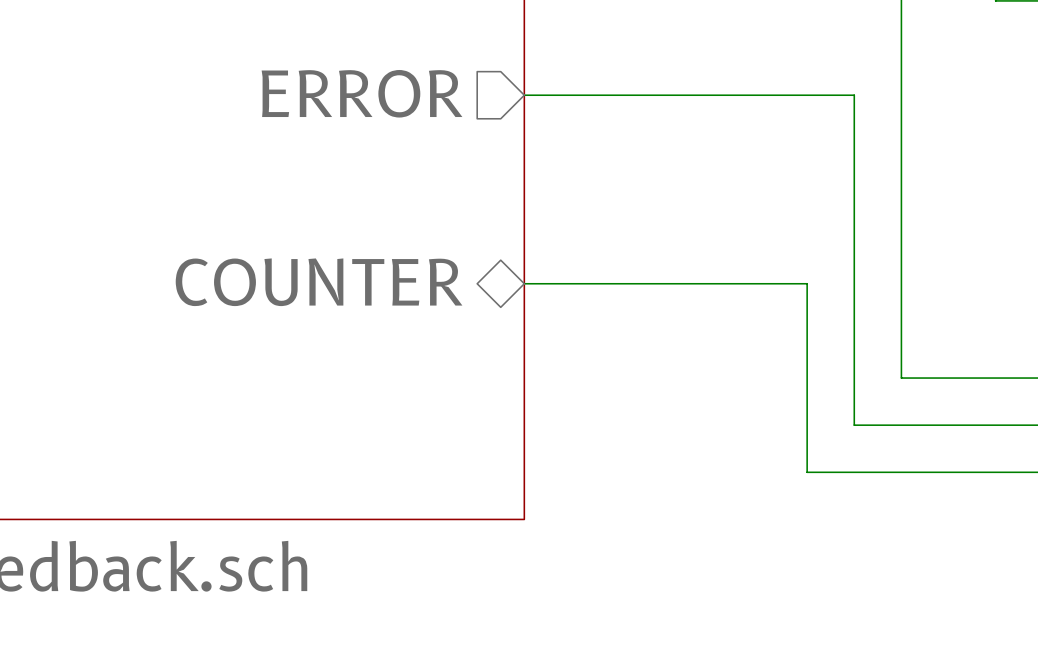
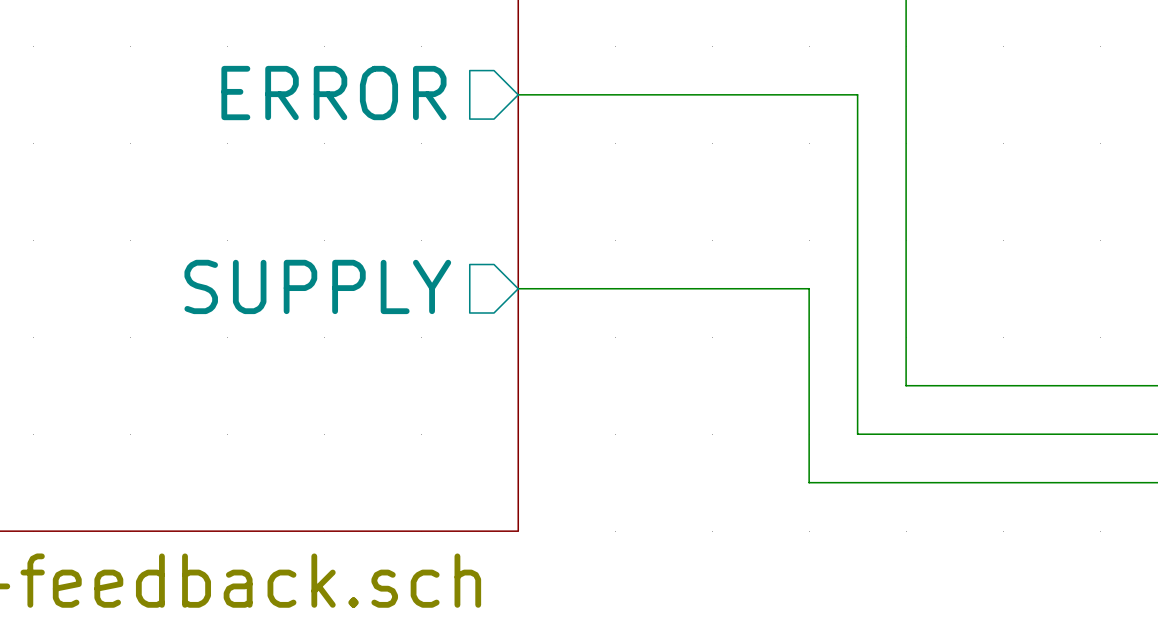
sheet pin shape: bidirectional (319, 282) -> output (317, 286)
sheet pin: COUNTER (319, 282) -> SUPPLY (317, 286)

